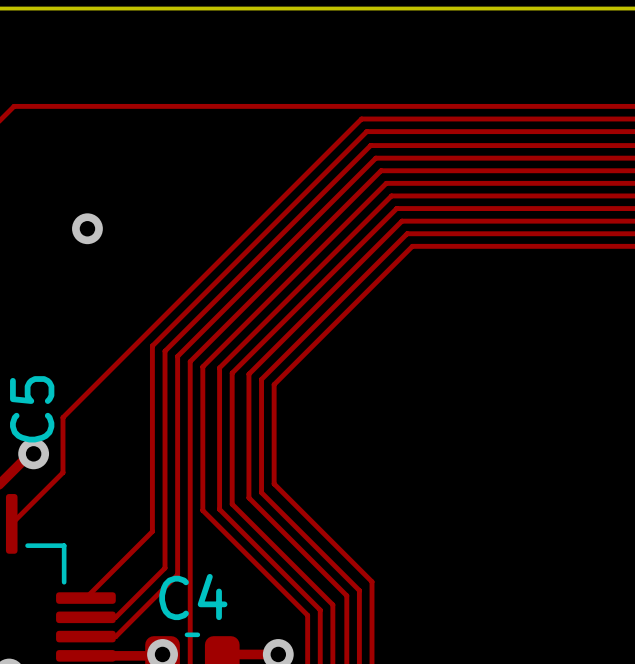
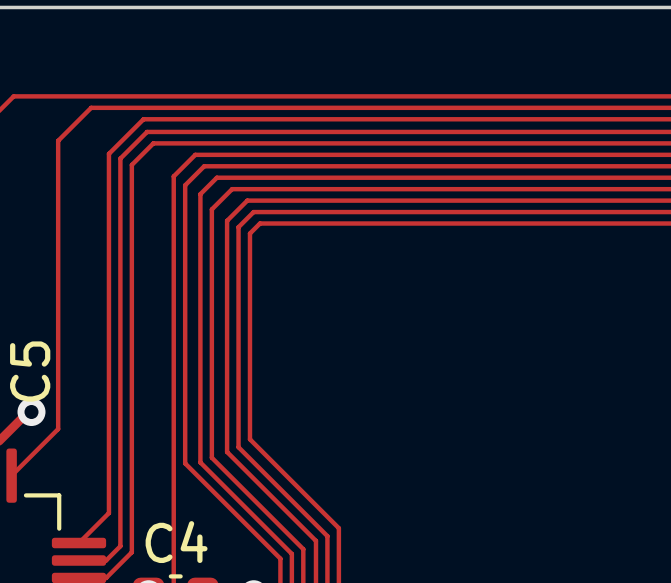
top track: (361, 119) (62, 417) -> (329, 107) (91, 107) (58, 140) (58, 379)
top track: (366, 131) (152, 345) (152, 531) (118, 565) -> (334, 119) (143, 119) (108, 153) (108, 513)
top track: (370, 145) (165, 351) (165, 568) (131, 601) -> (337, 131) (147, 131) (120, 158) (120, 546)
top track: (375, 158) (177, 356) (177, 574) (144, 608) -> (342, 143) (153, 143) (131, 164) (131, 552)
top track: (381, 170) (190, 361) -> (347, 154) (195, 154) (173, 176) (173, 328)
top track: (386, 183) (202, 366) -> (351, 166) (204, 166) (185, 185) (185, 332)
top track: (391, 195) (219, 367) -> (356, 177) (216, 177) (200, 194) (200, 333)
top track: (396, 208) (232, 373) -> (361, 189) (232, 189) (211, 209) (211, 338)
top track: (401, 221) (248, 374) -> (366, 200) (247, 200) (227, 220) (227, 339)
via: (87, 228) -> none
top track: (407, 233) (261, 379) -> (370, 212) (253, 212) (238, 227) (238, 344)
top track: (412, 246) (274, 384) -> (375, 223) (259, 223) (249, 233) (249, 349)

